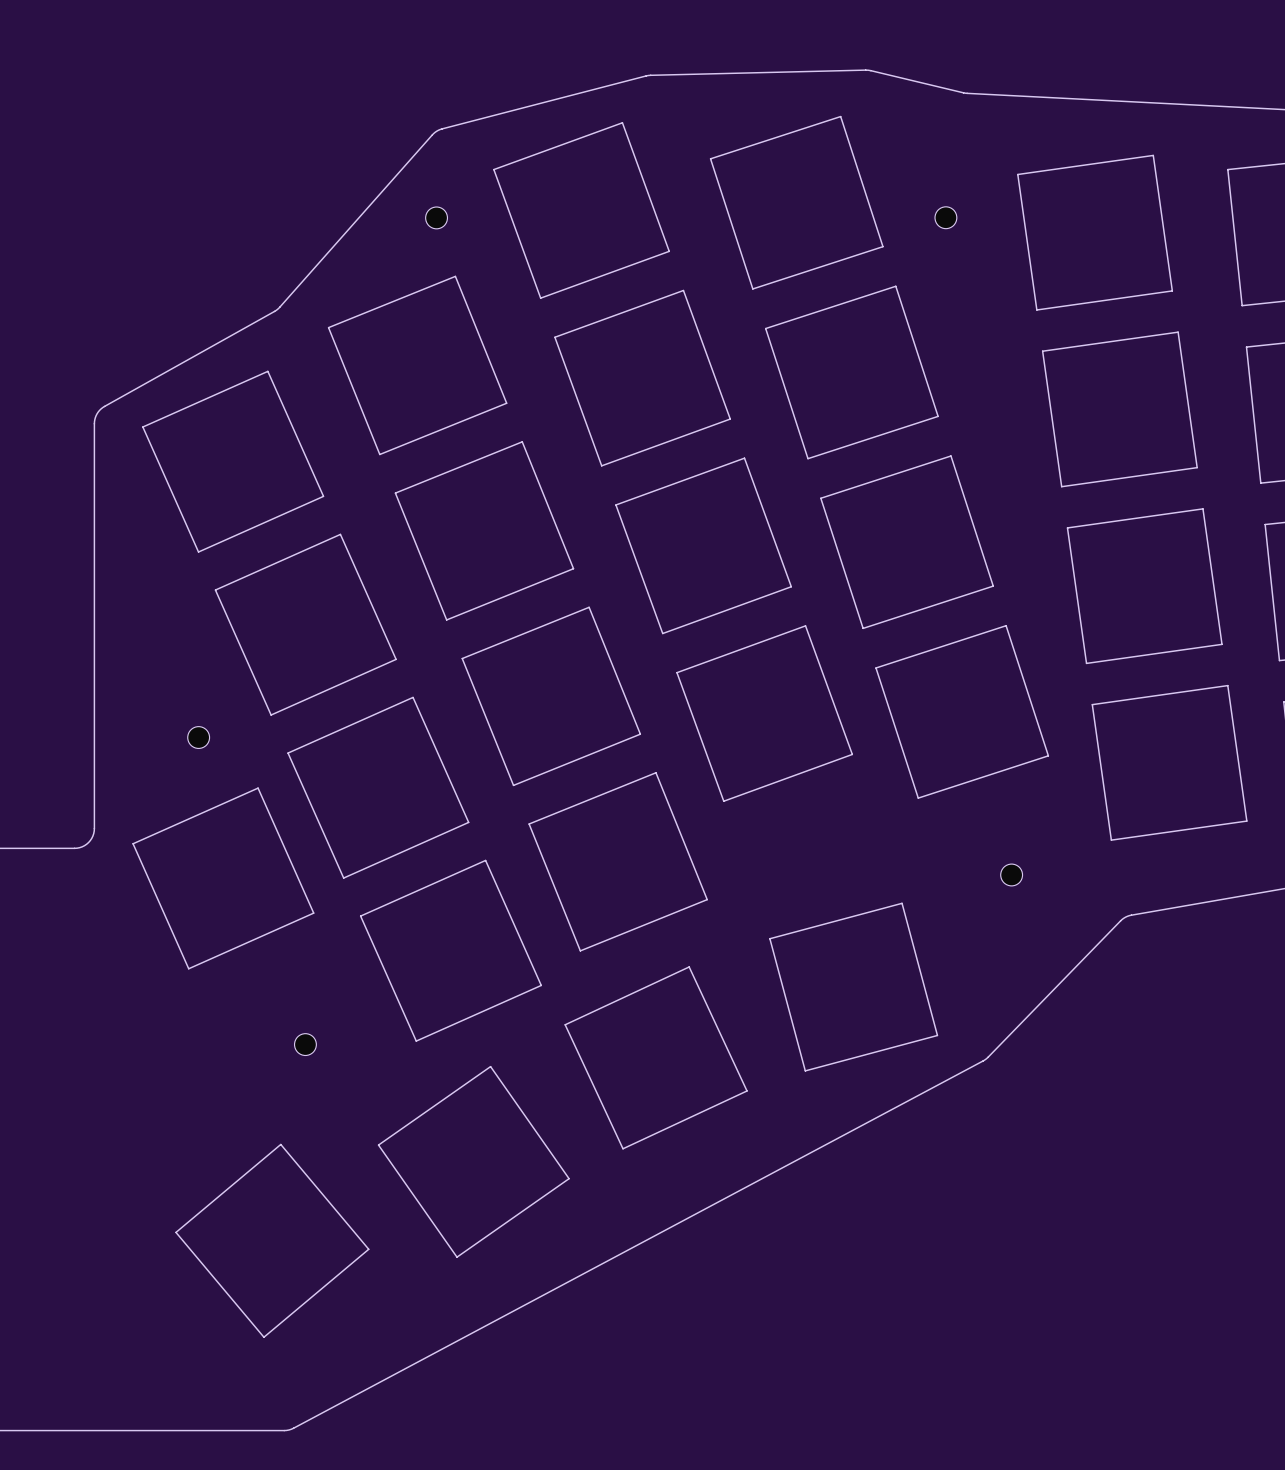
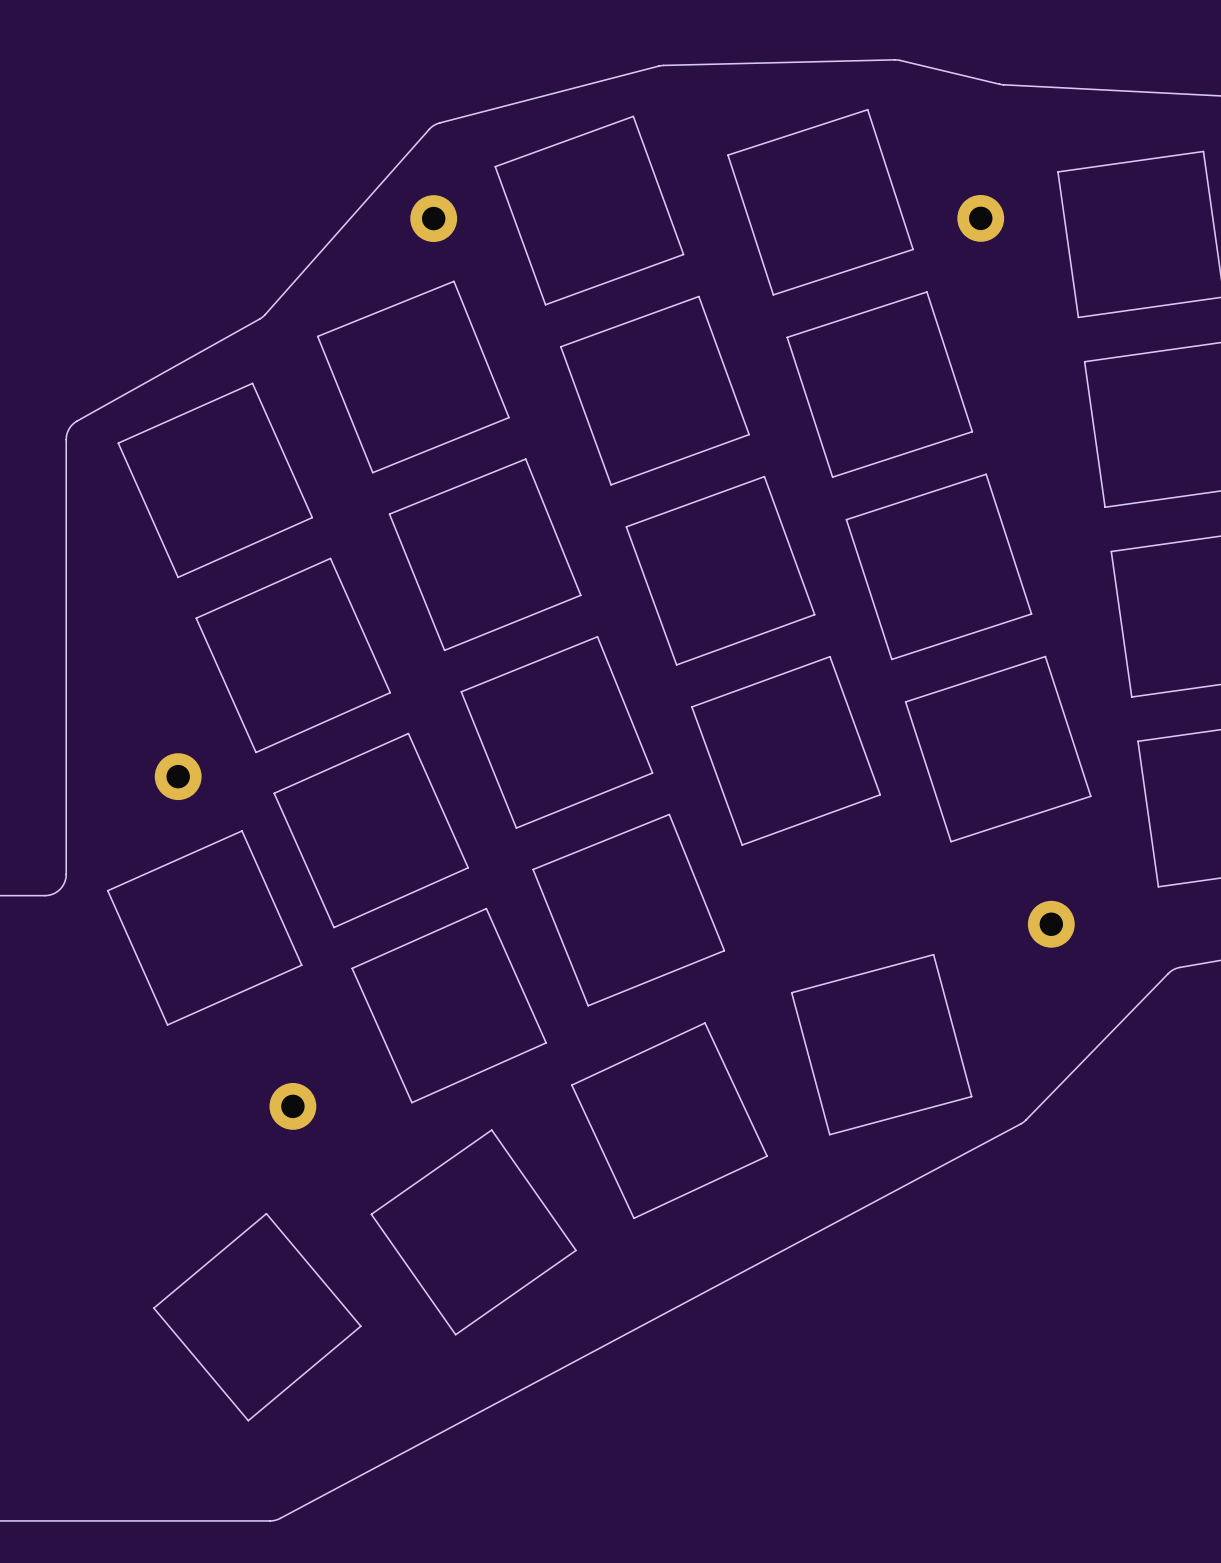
part footprint: [935, 206, 957, 229] -> [957, 194, 1005, 242]
part footprint: [425, 207, 448, 229] -> [410, 195, 458, 243]
part footprint: [187, 726, 210, 749] -> [154, 753, 202, 801]
part footprint: [1000, 864, 1023, 886] -> [1027, 900, 1075, 948]
part footprint: [294, 1033, 317, 1056] -> [269, 1082, 317, 1130]

